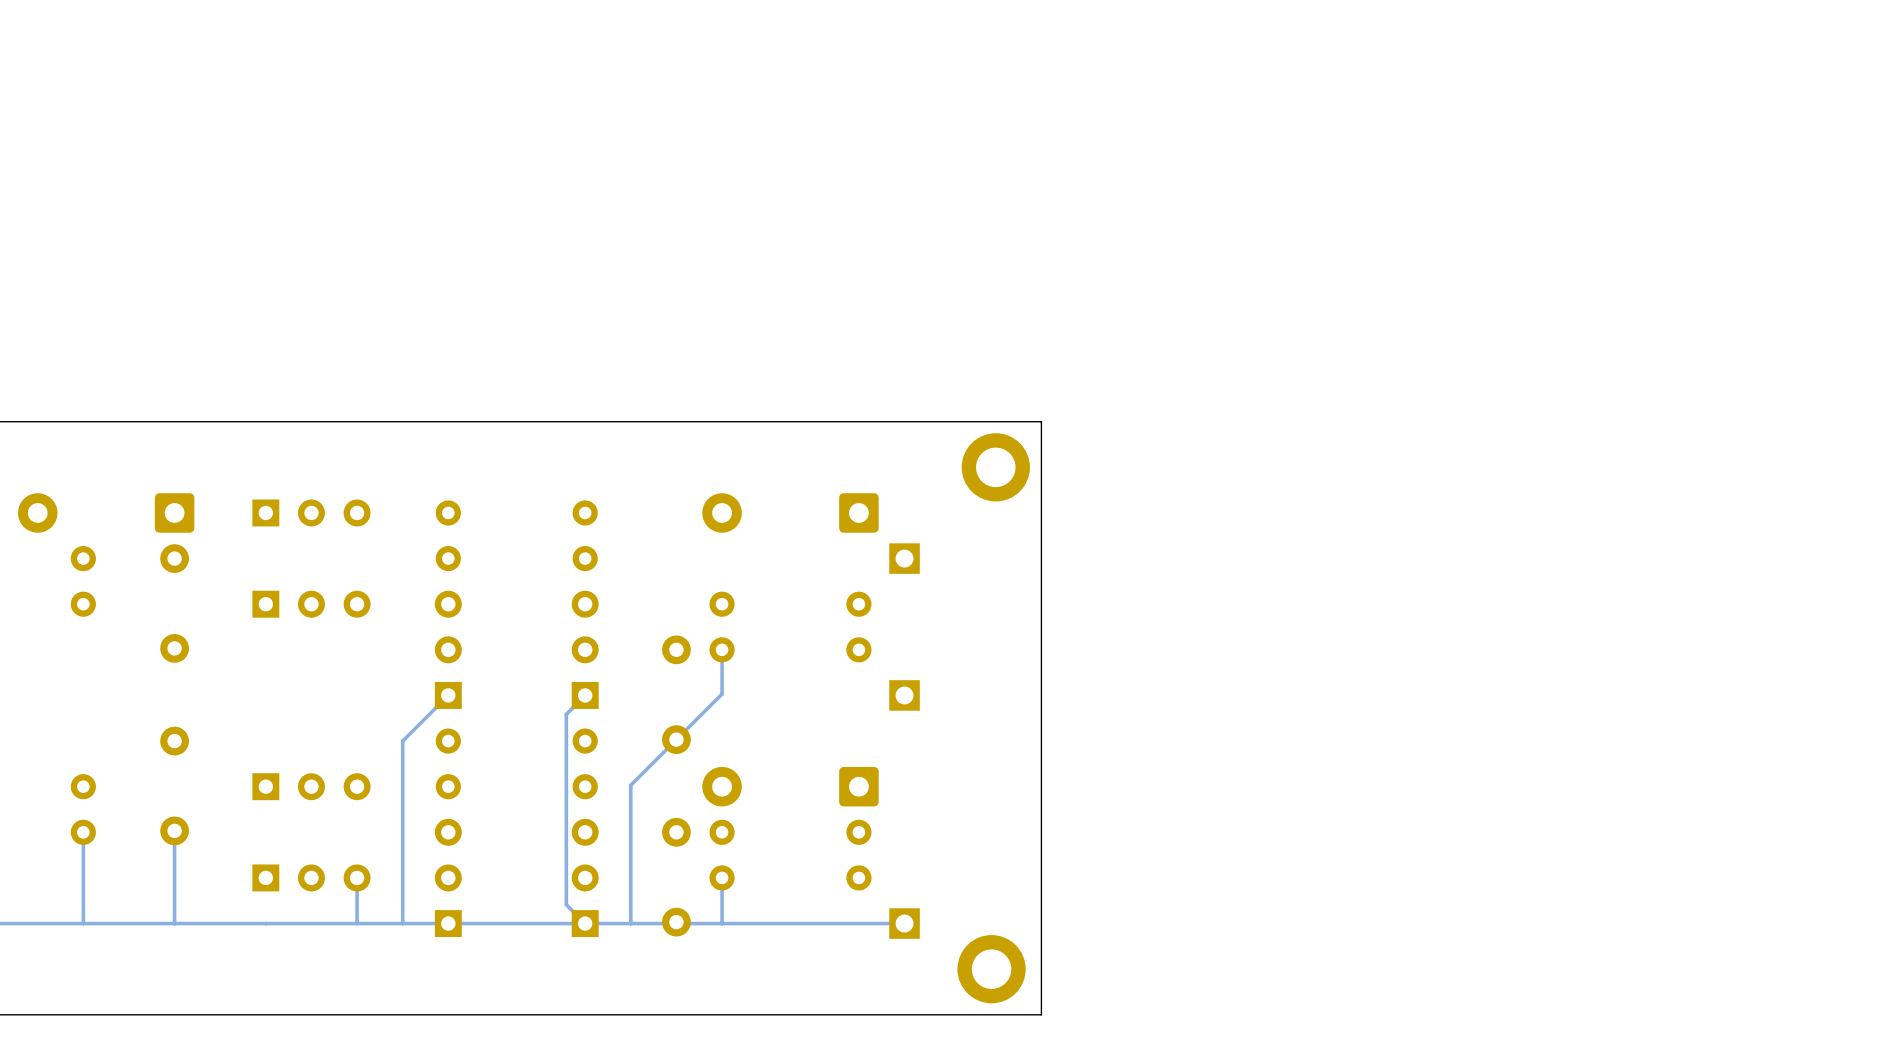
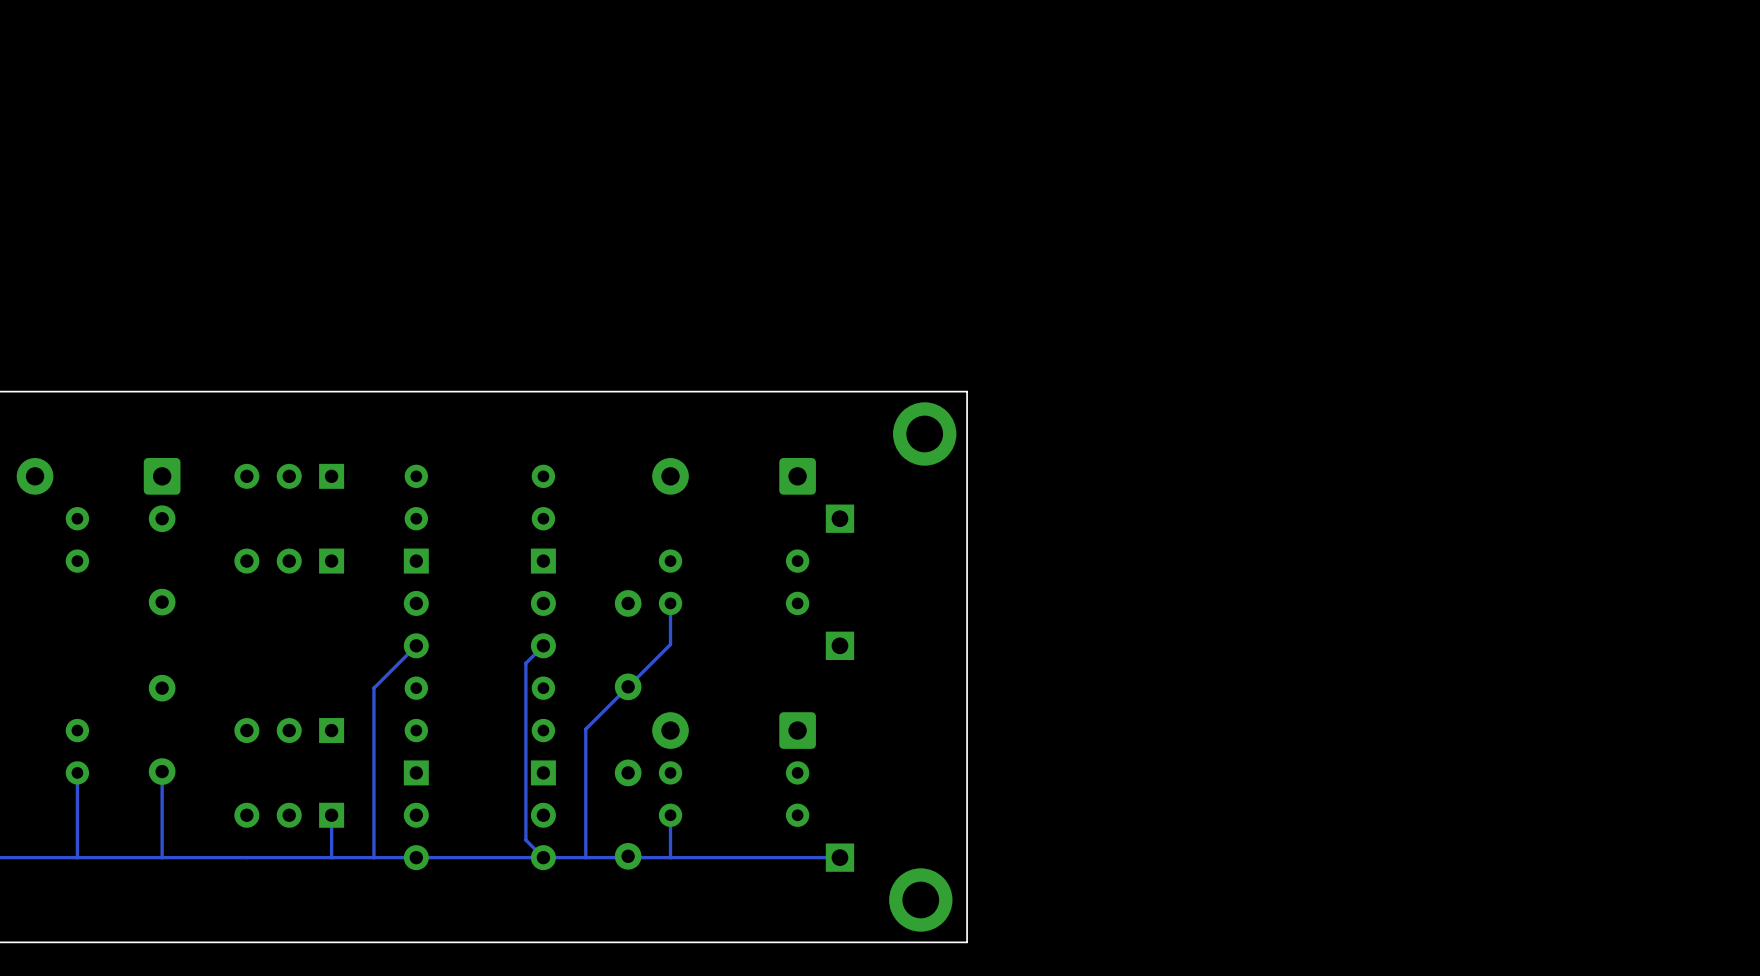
part rotation: 0° (311, 512) -> 180° (289, 476)
part rotation: 0° (311, 604) -> 180° (289, 561)
part rotation: 0° (448, 649) -> 180° (416, 603)
part rotation: 0° (585, 649) -> 180° (543, 603)
part rotation: 0° (311, 786) -> 180° (289, 730)
part rotation: 0° (311, 877) -> 180° (289, 815)
part rotation: 0° (448, 877) -> 180° (416, 815)
part rotation: 0° (585, 877) -> 180° (543, 815)

